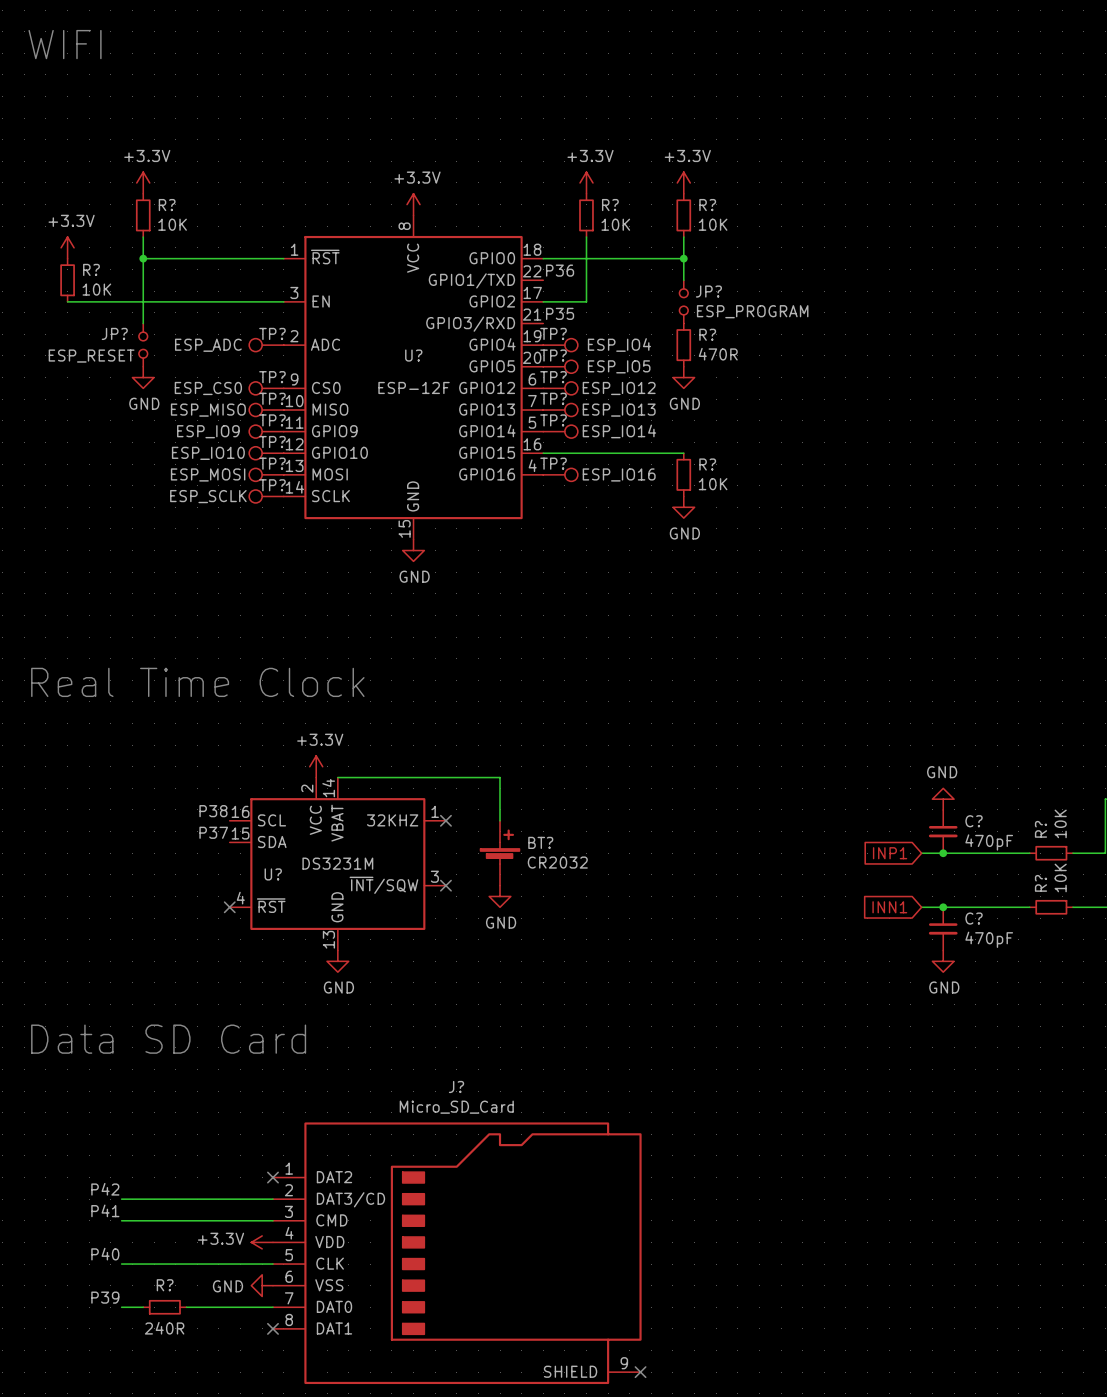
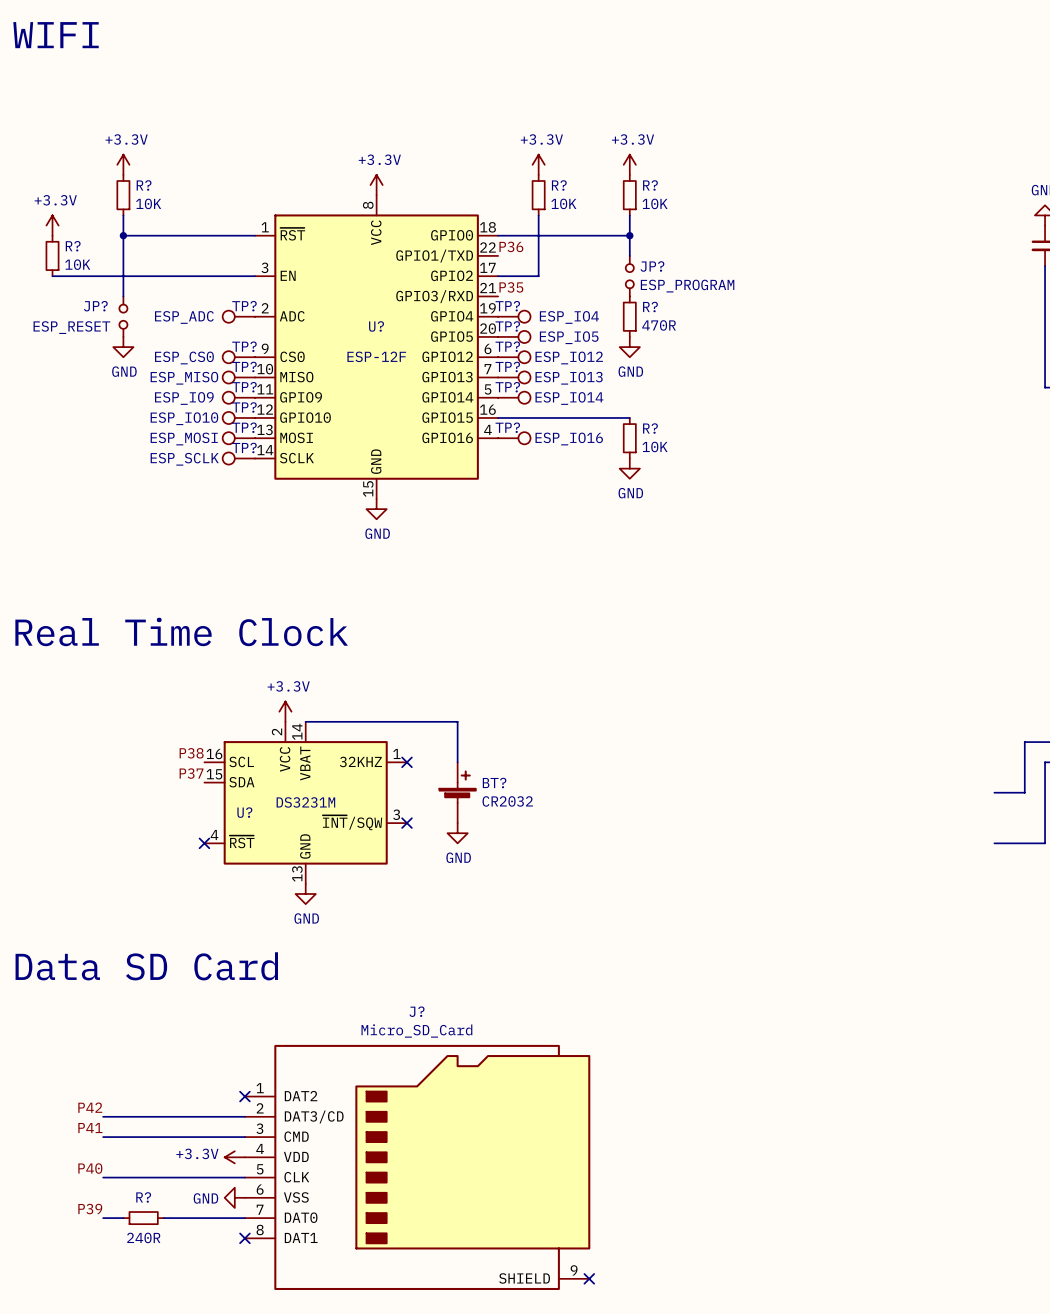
power symbol: GND (943, 799) -> none
C?: 470pF (943, 831) -> none
global label: INP1 (890, 853) -> none
wire: (921, 853) (1029, 853) -> none
junction: (943, 853) -> none
R?: 10K (1051, 853) -> none
global label: INN1 (889, 907) -> none
wire: (921, 907) (1029, 907) -> none
junction: (943, 907) -> none
R?: 10K (1051, 907) -> none
C?: 470pF (943, 928) -> none
power symbol: GND (943, 961) -> none

